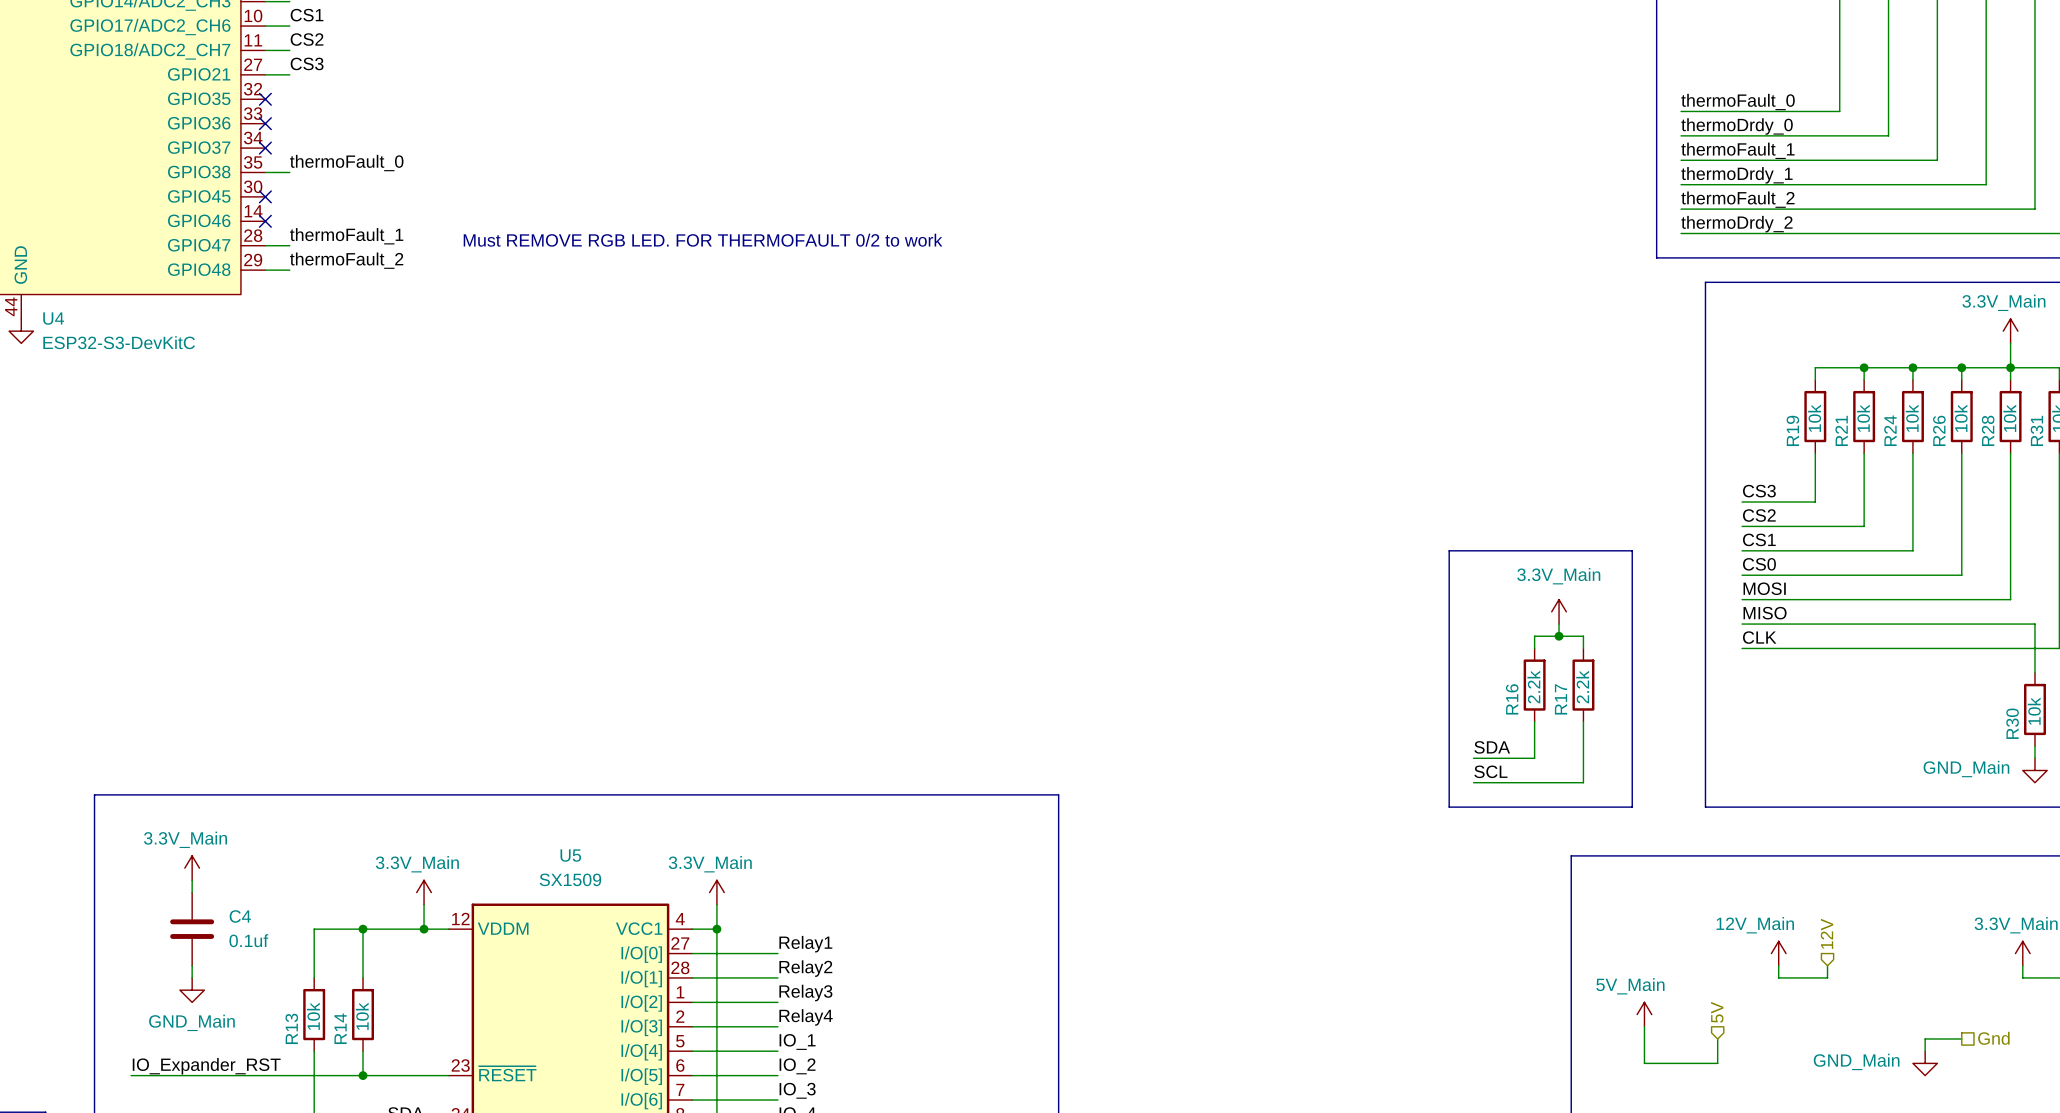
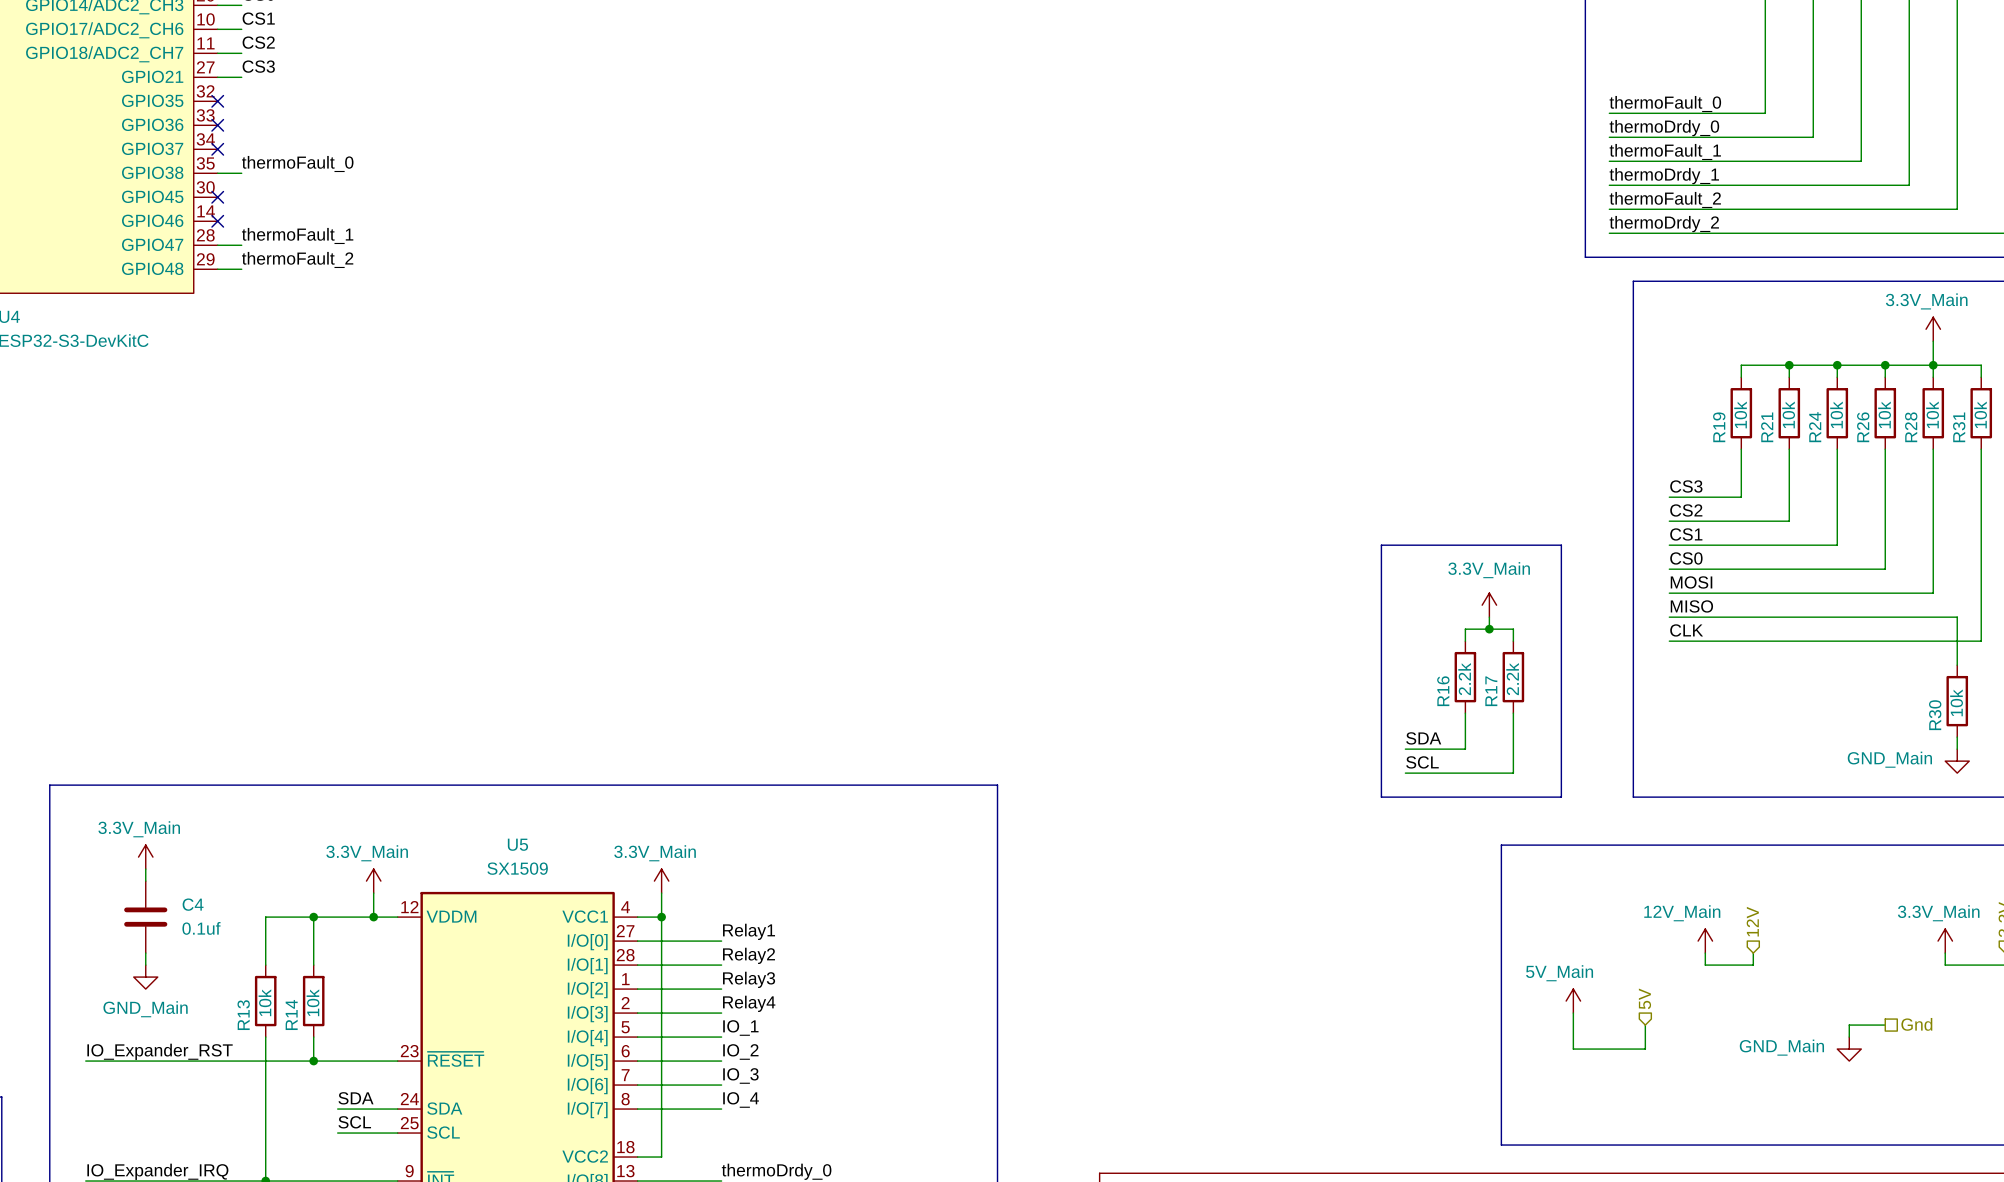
text: Must REMOVE RGB LED. FOR THERMOFAULT 0/2 to work (703, 240) -> none

